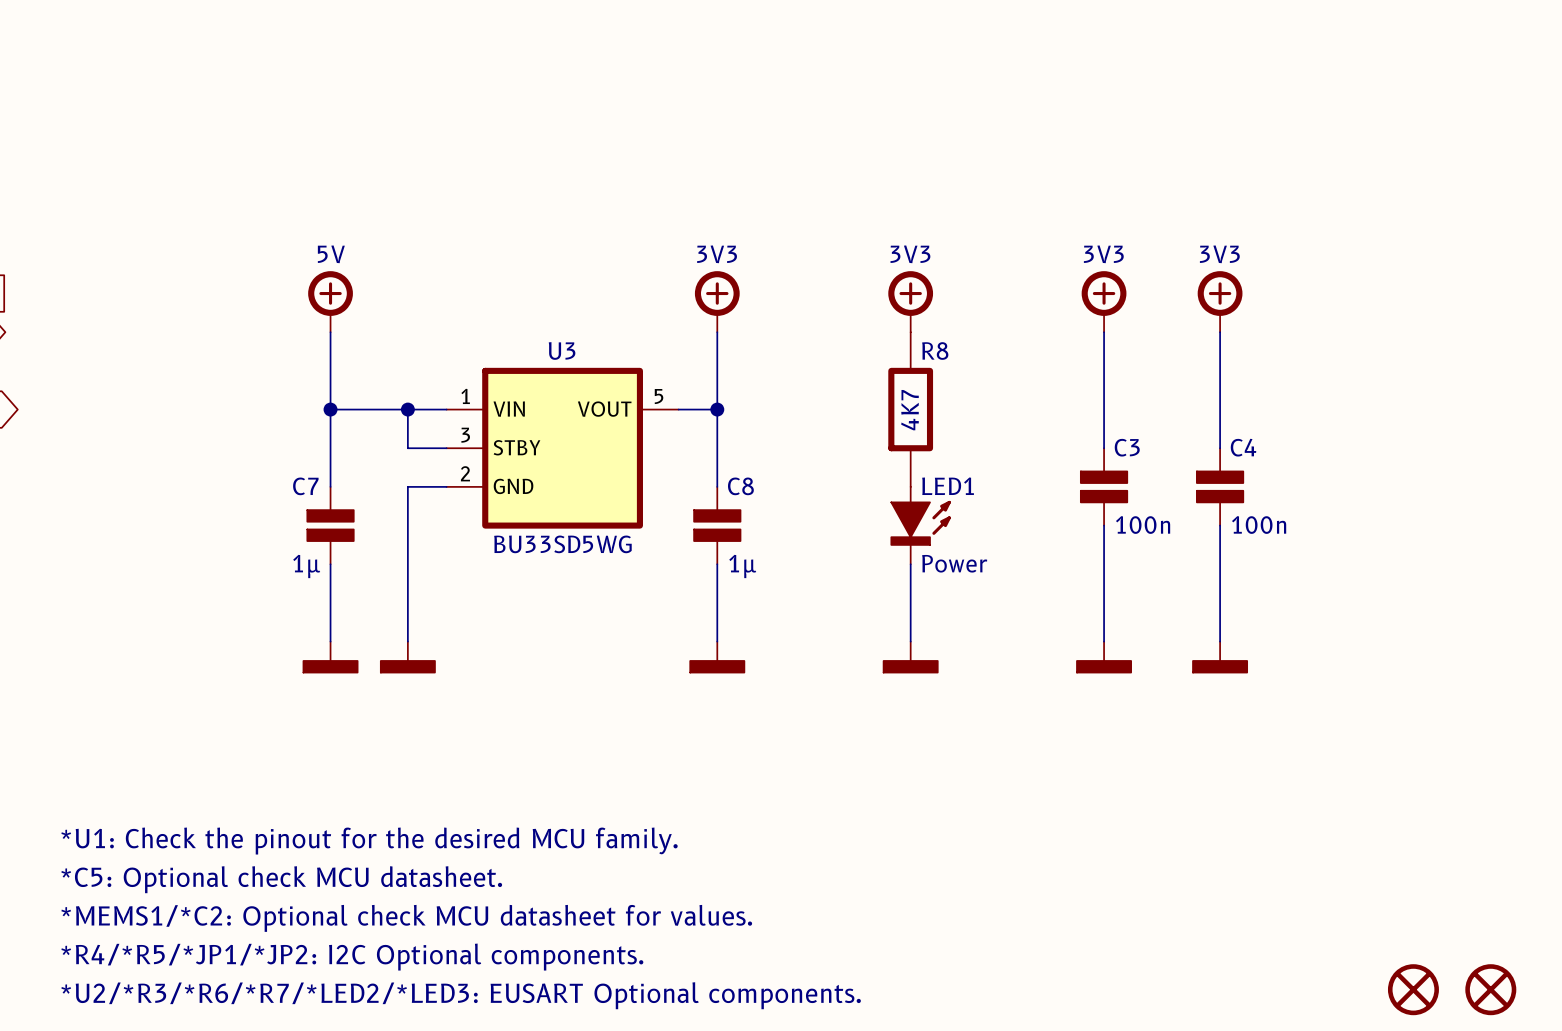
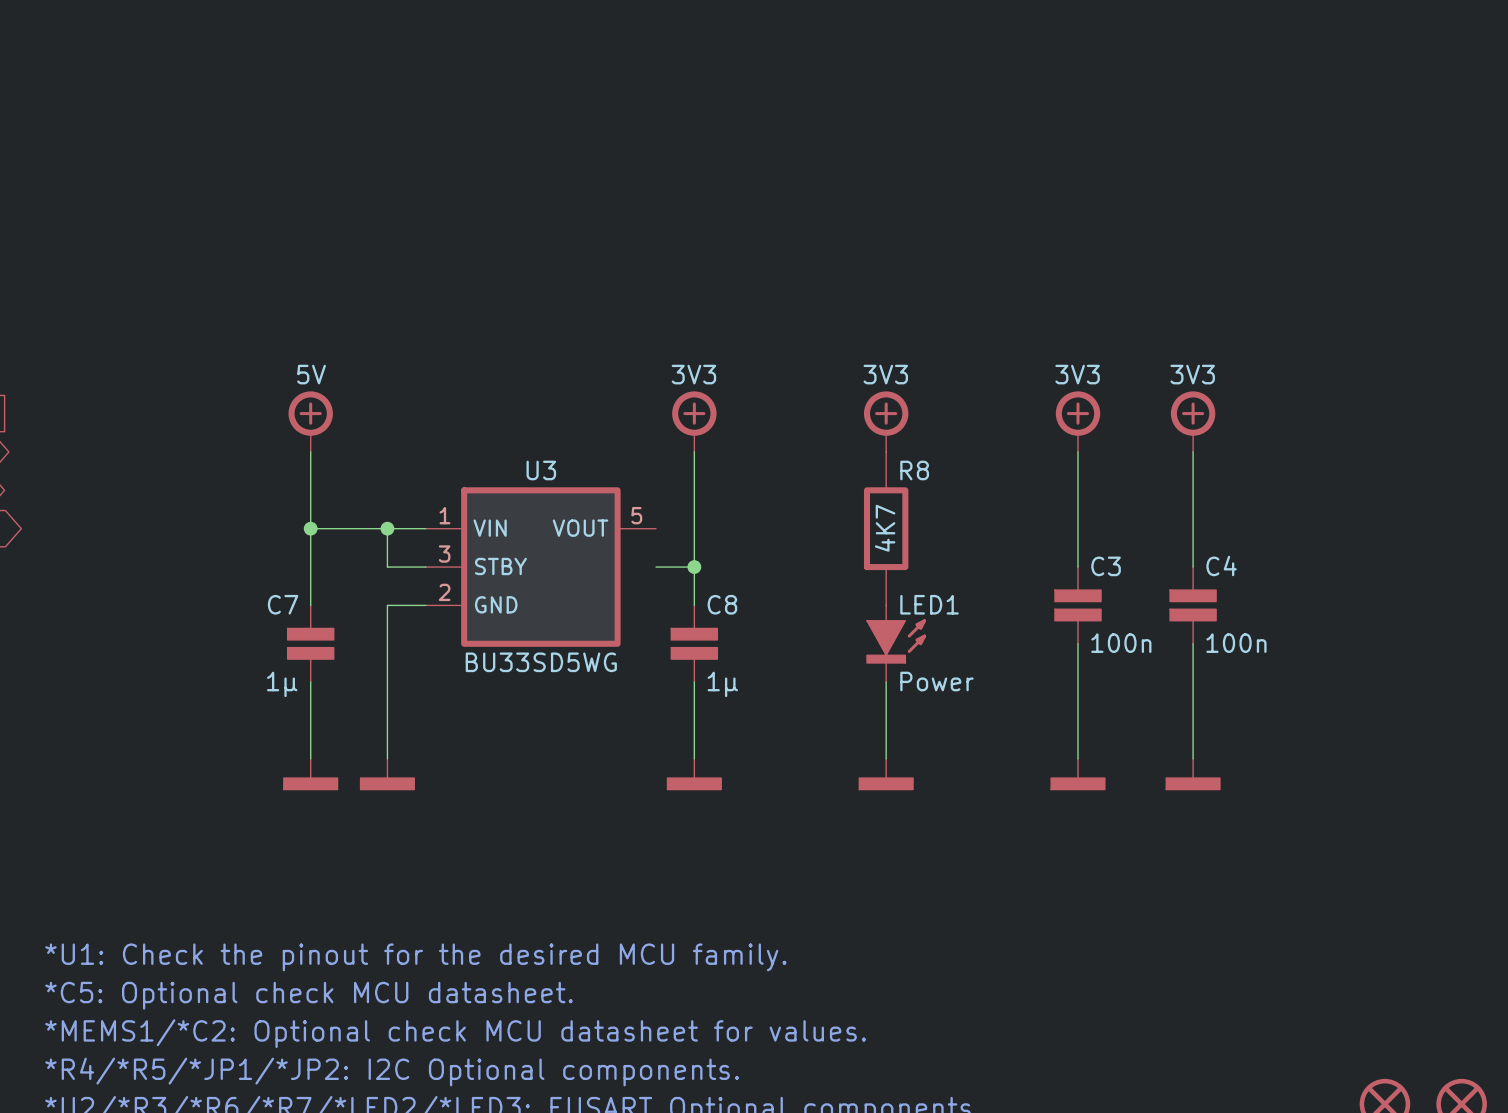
wire: (678, 409) (717, 409) -> (655, 567) (694, 567)
junction position: (717, 409) -> (694, 567)

